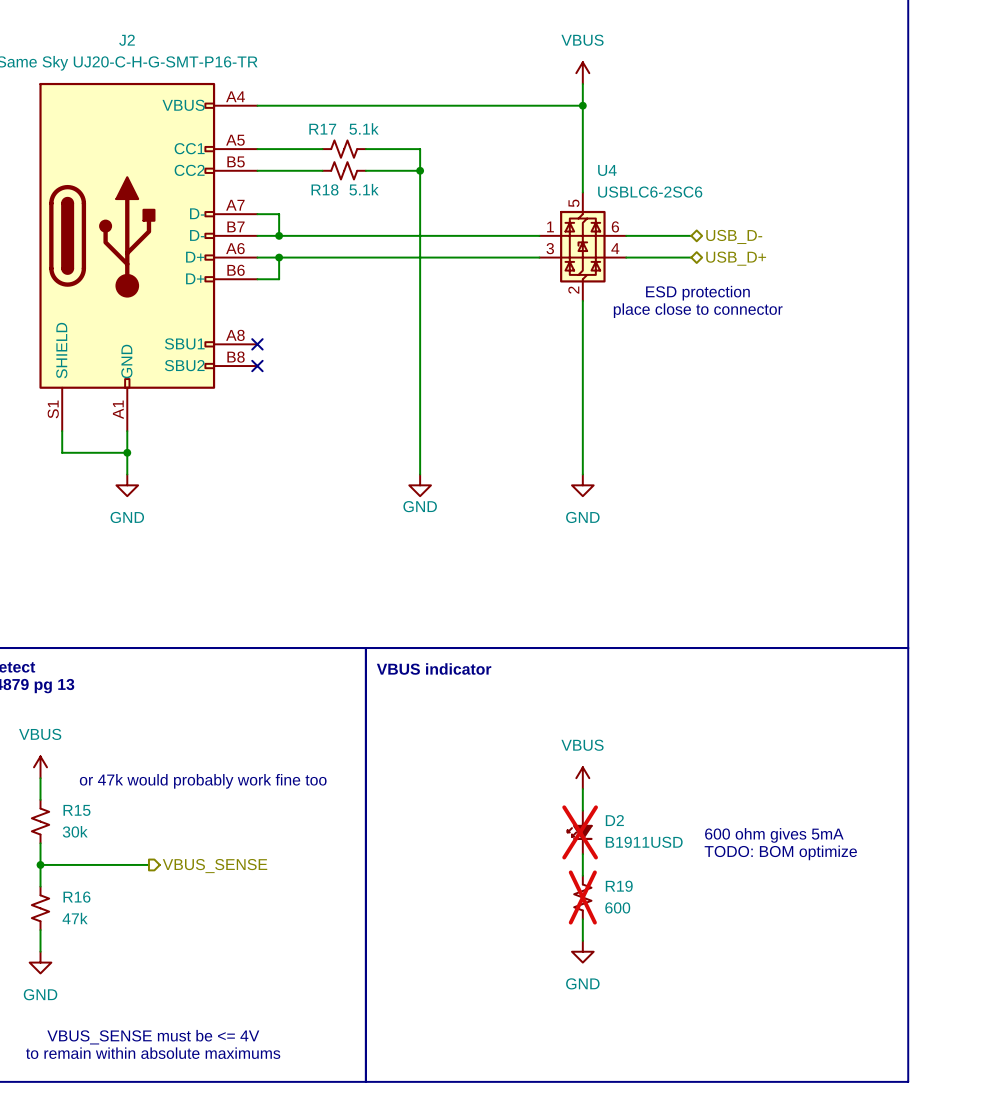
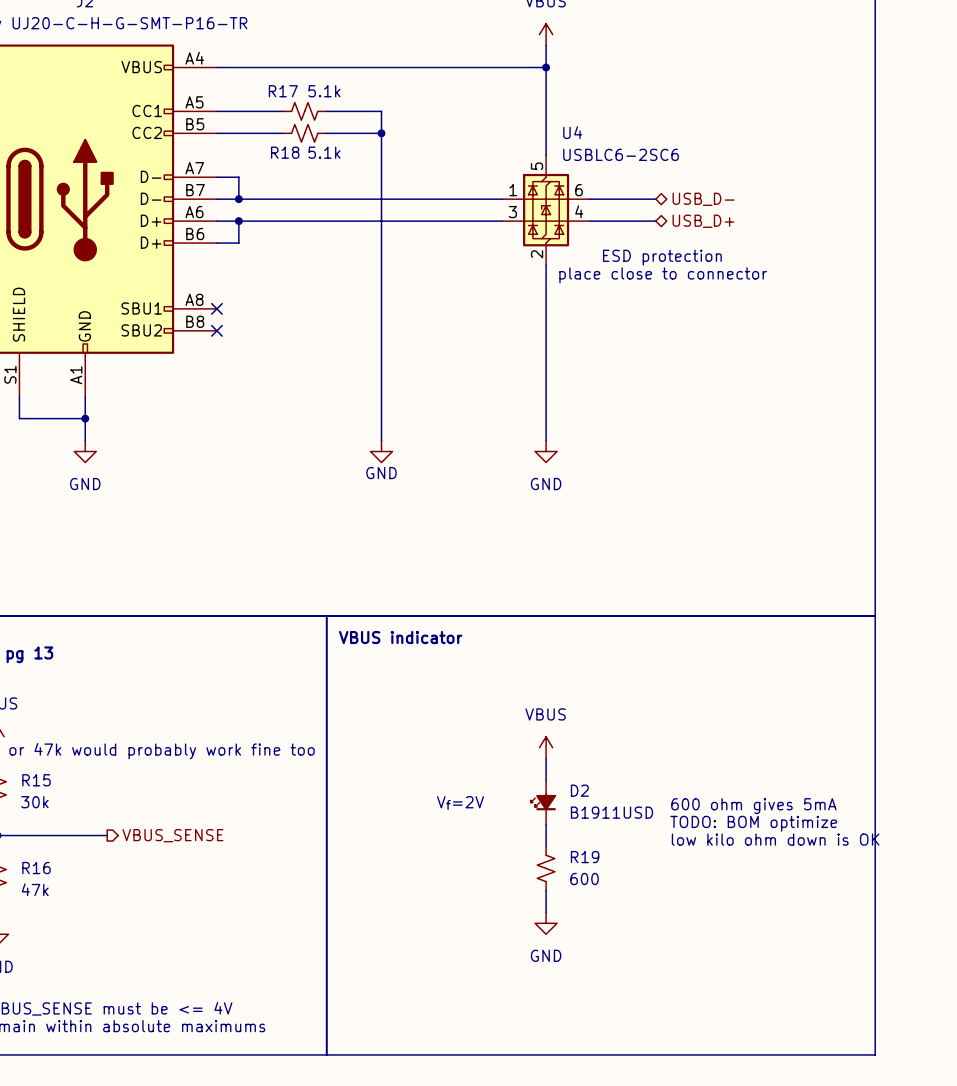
text: none -> Vf=2V (460, 803)
D2 do-not-place cross: (580, 832) -> none
text: none -> low kilo ohm down is OK (775, 839)
R19 do-not-place cross: (582, 897) -> none

